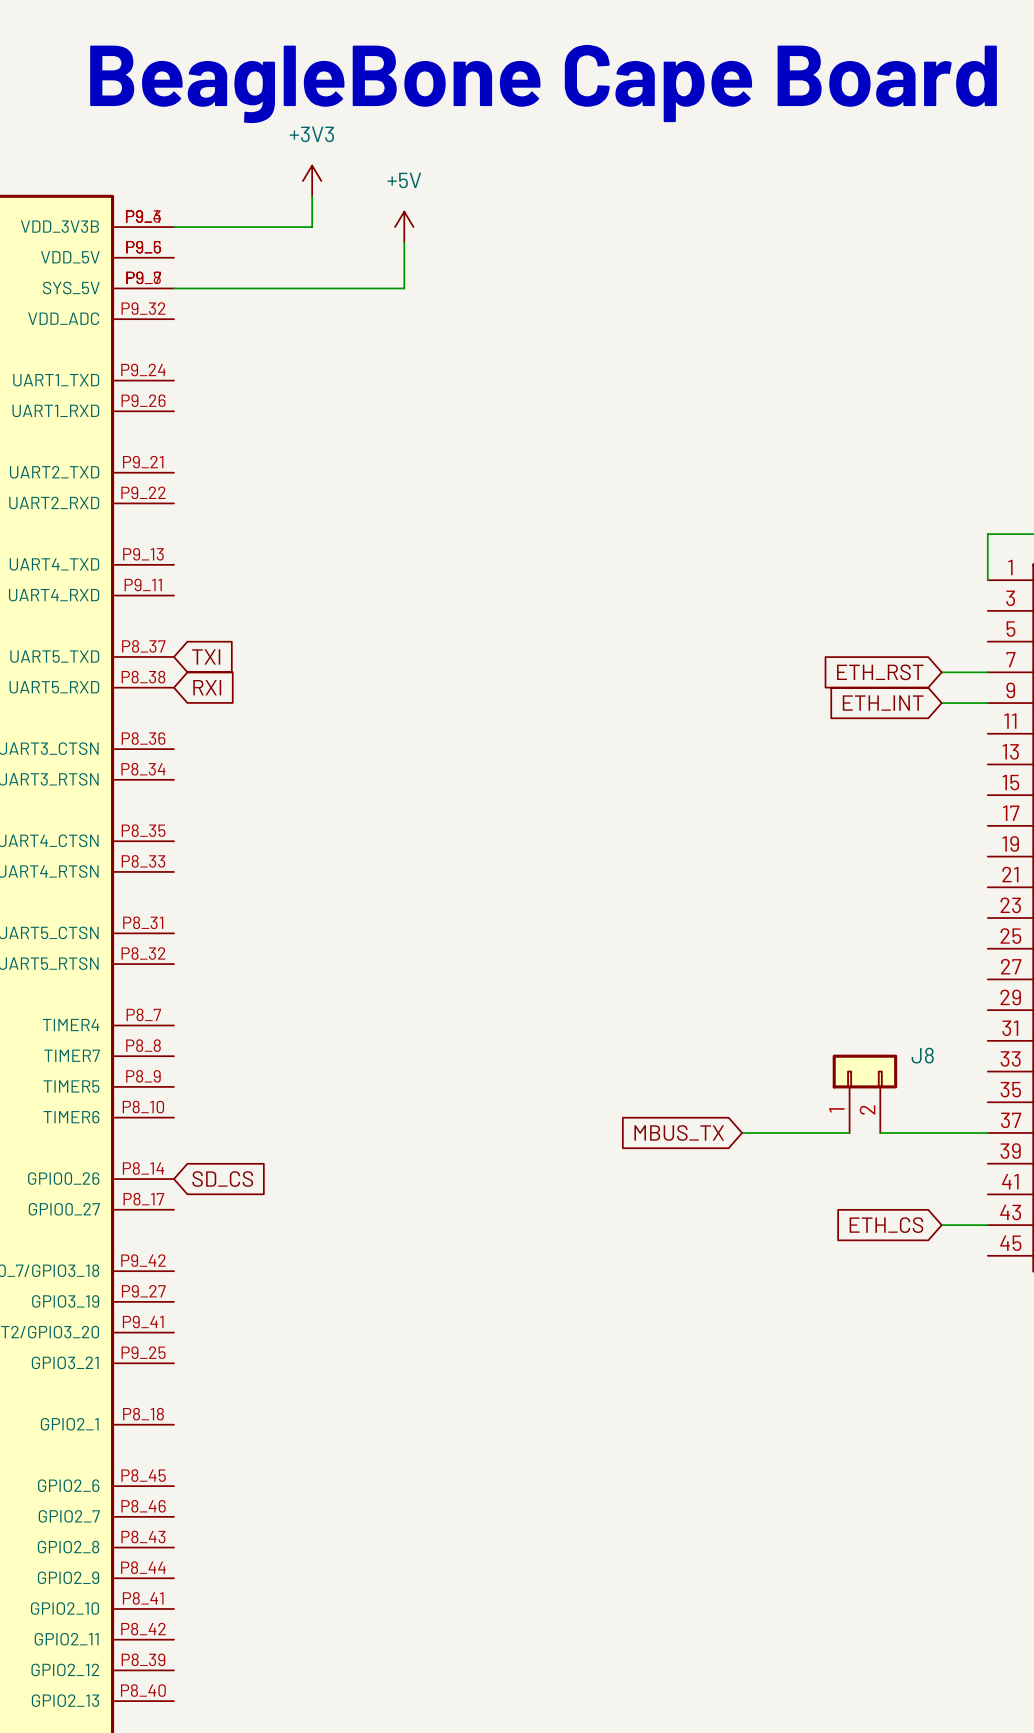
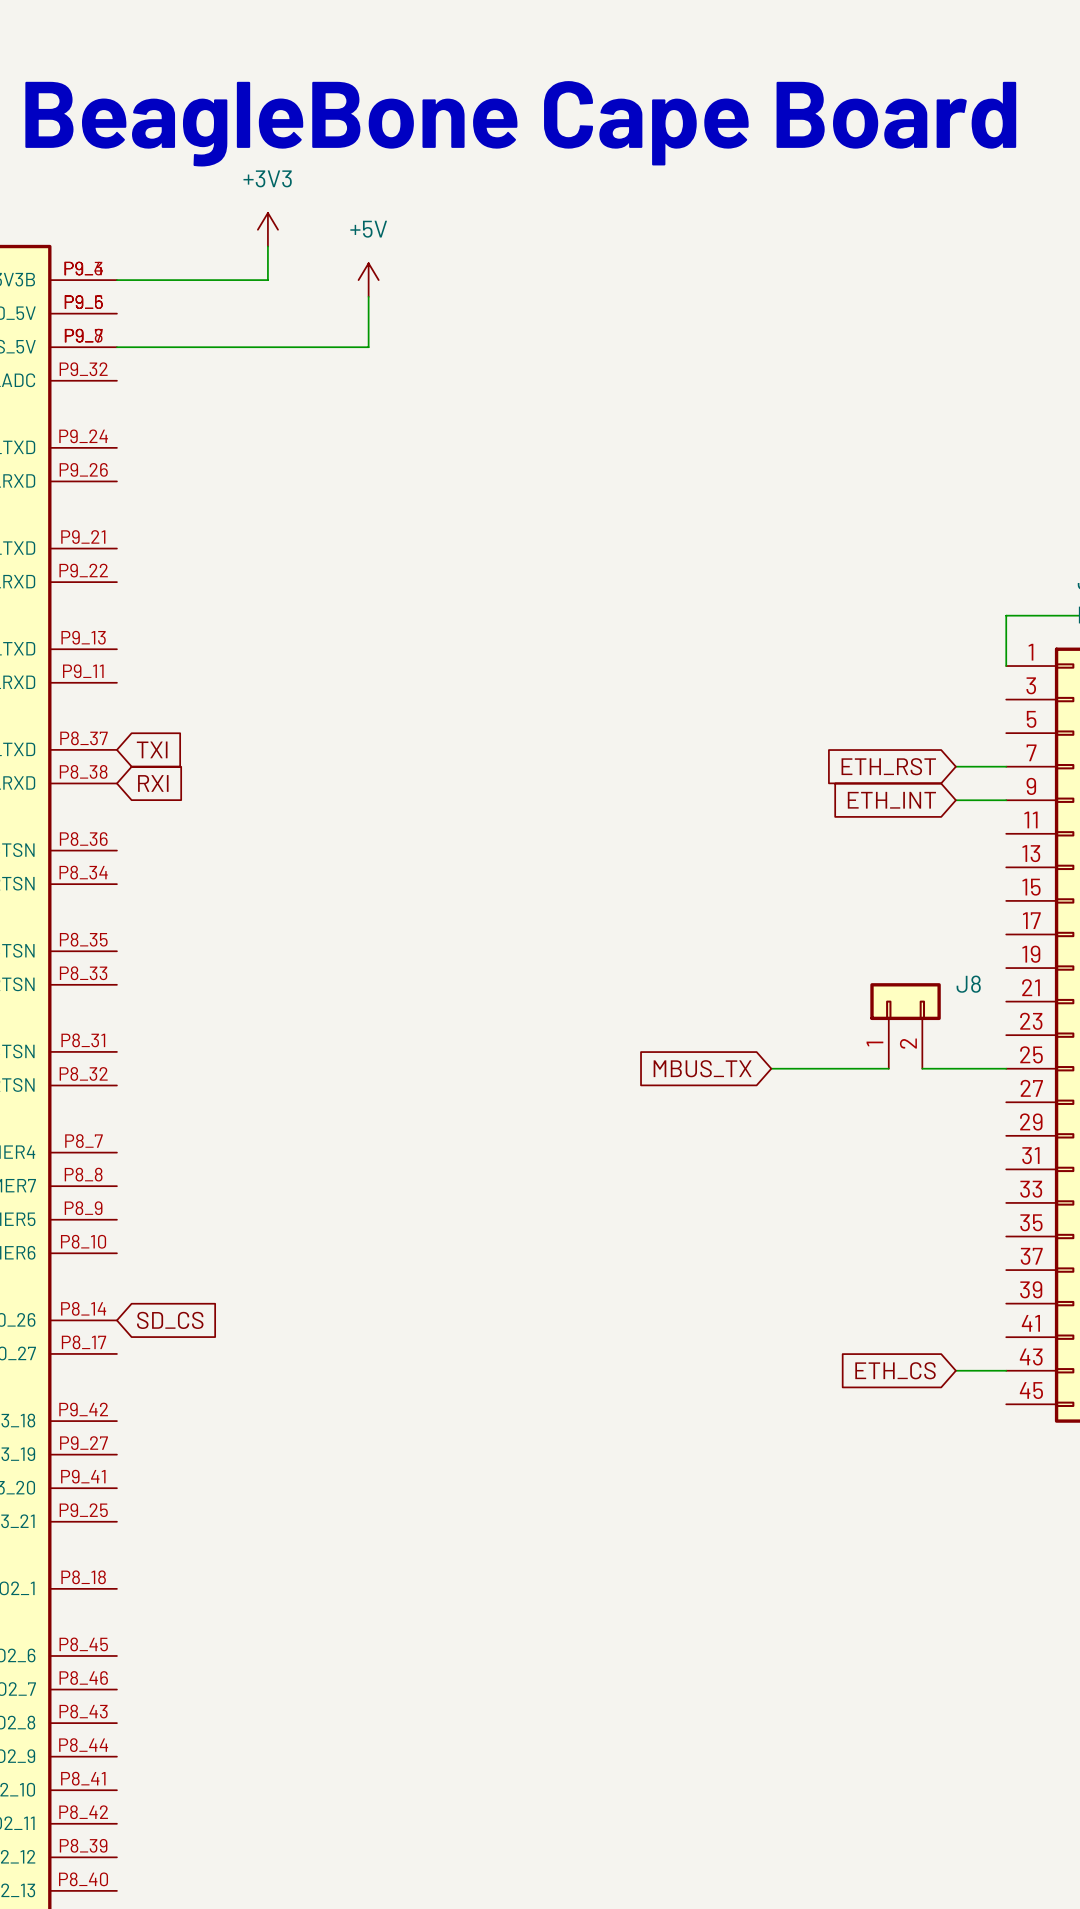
wire: none -> (922, 1068) (1006, 1068)
J8 position: (864, 1093) -> (905, 1025)
global label position: MBUS_TX (679, 1132) -> MBUS_TX (702, 1068)
wire: (742, 1132) (849, 1132) -> (771, 1068) (888, 1068)
wire: (880, 1132) (987, 1132) -> none

